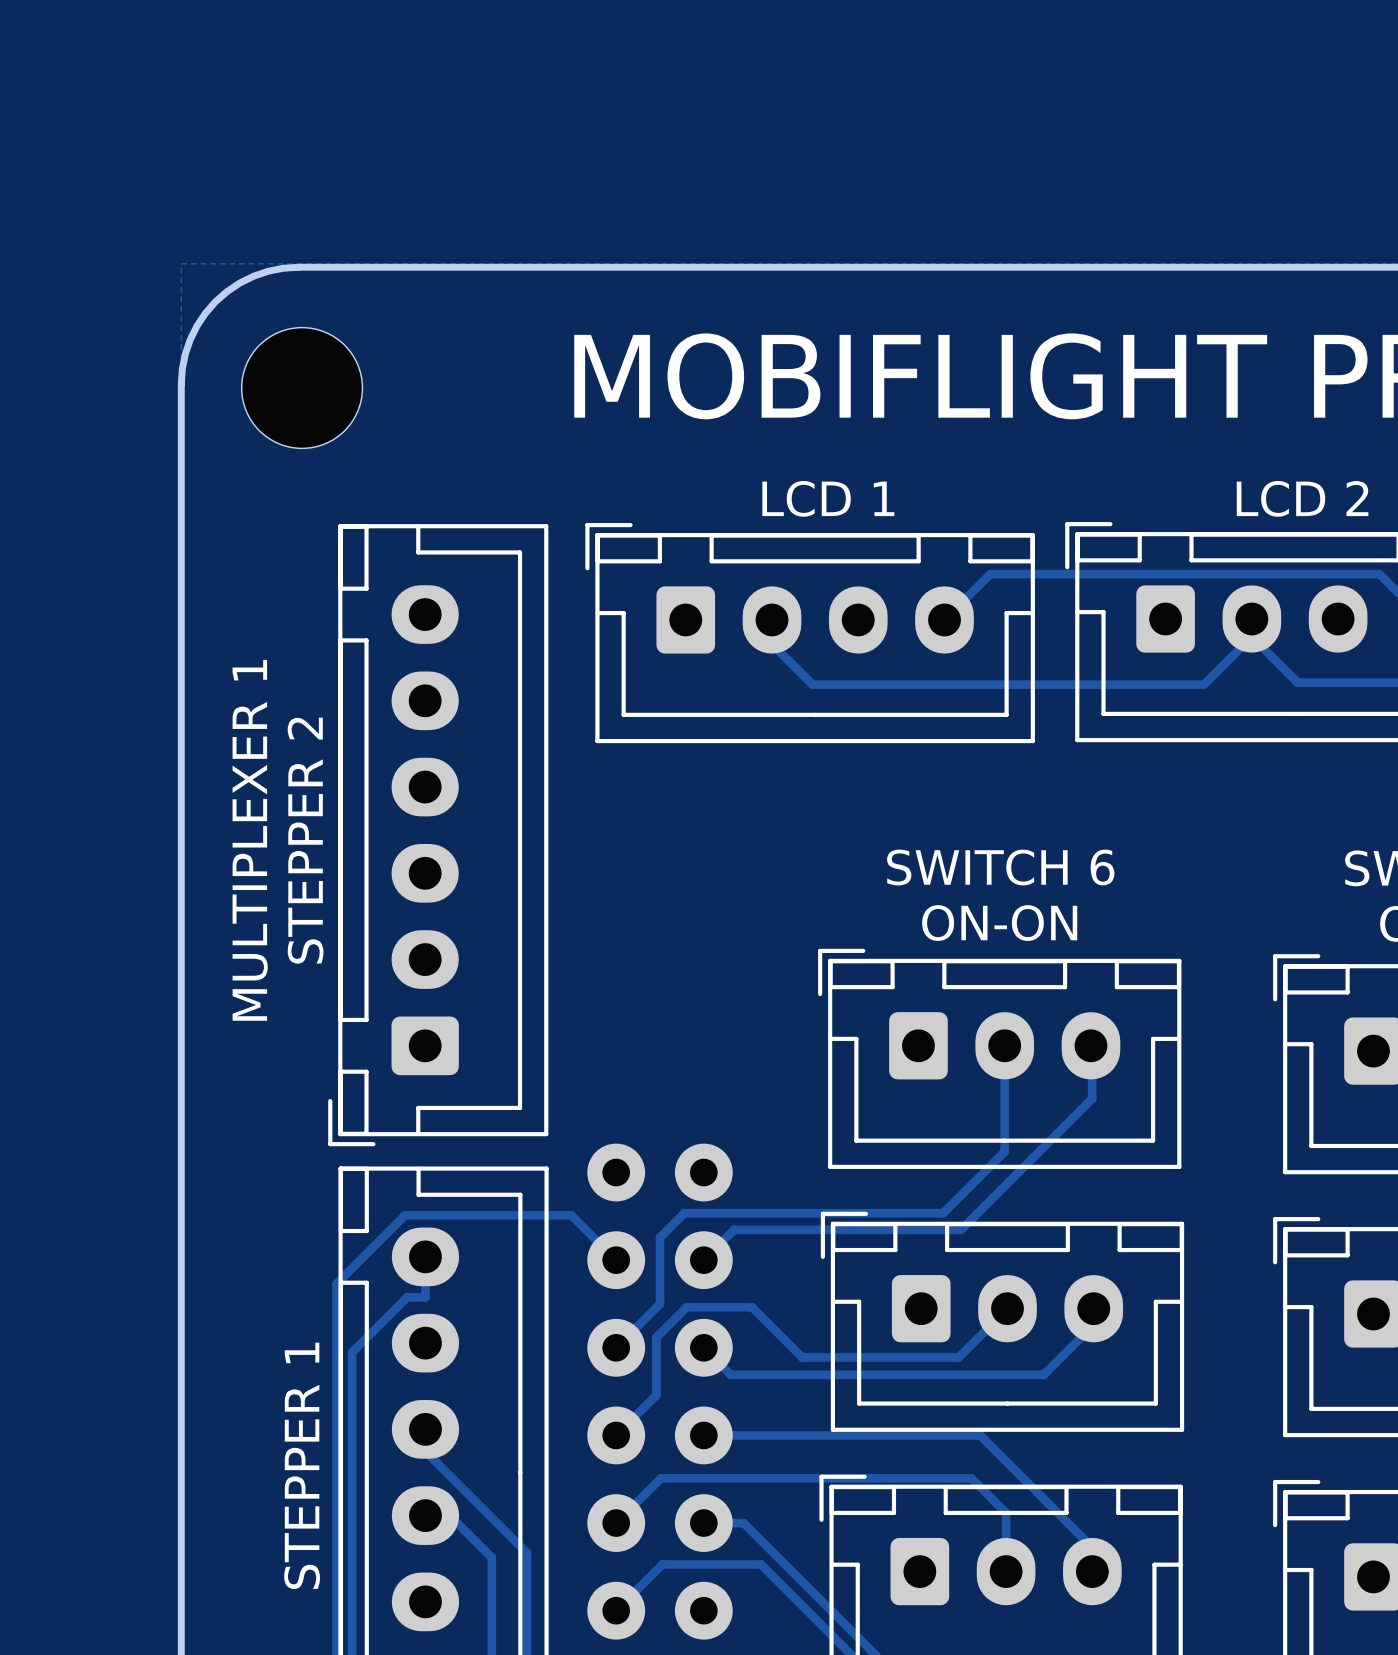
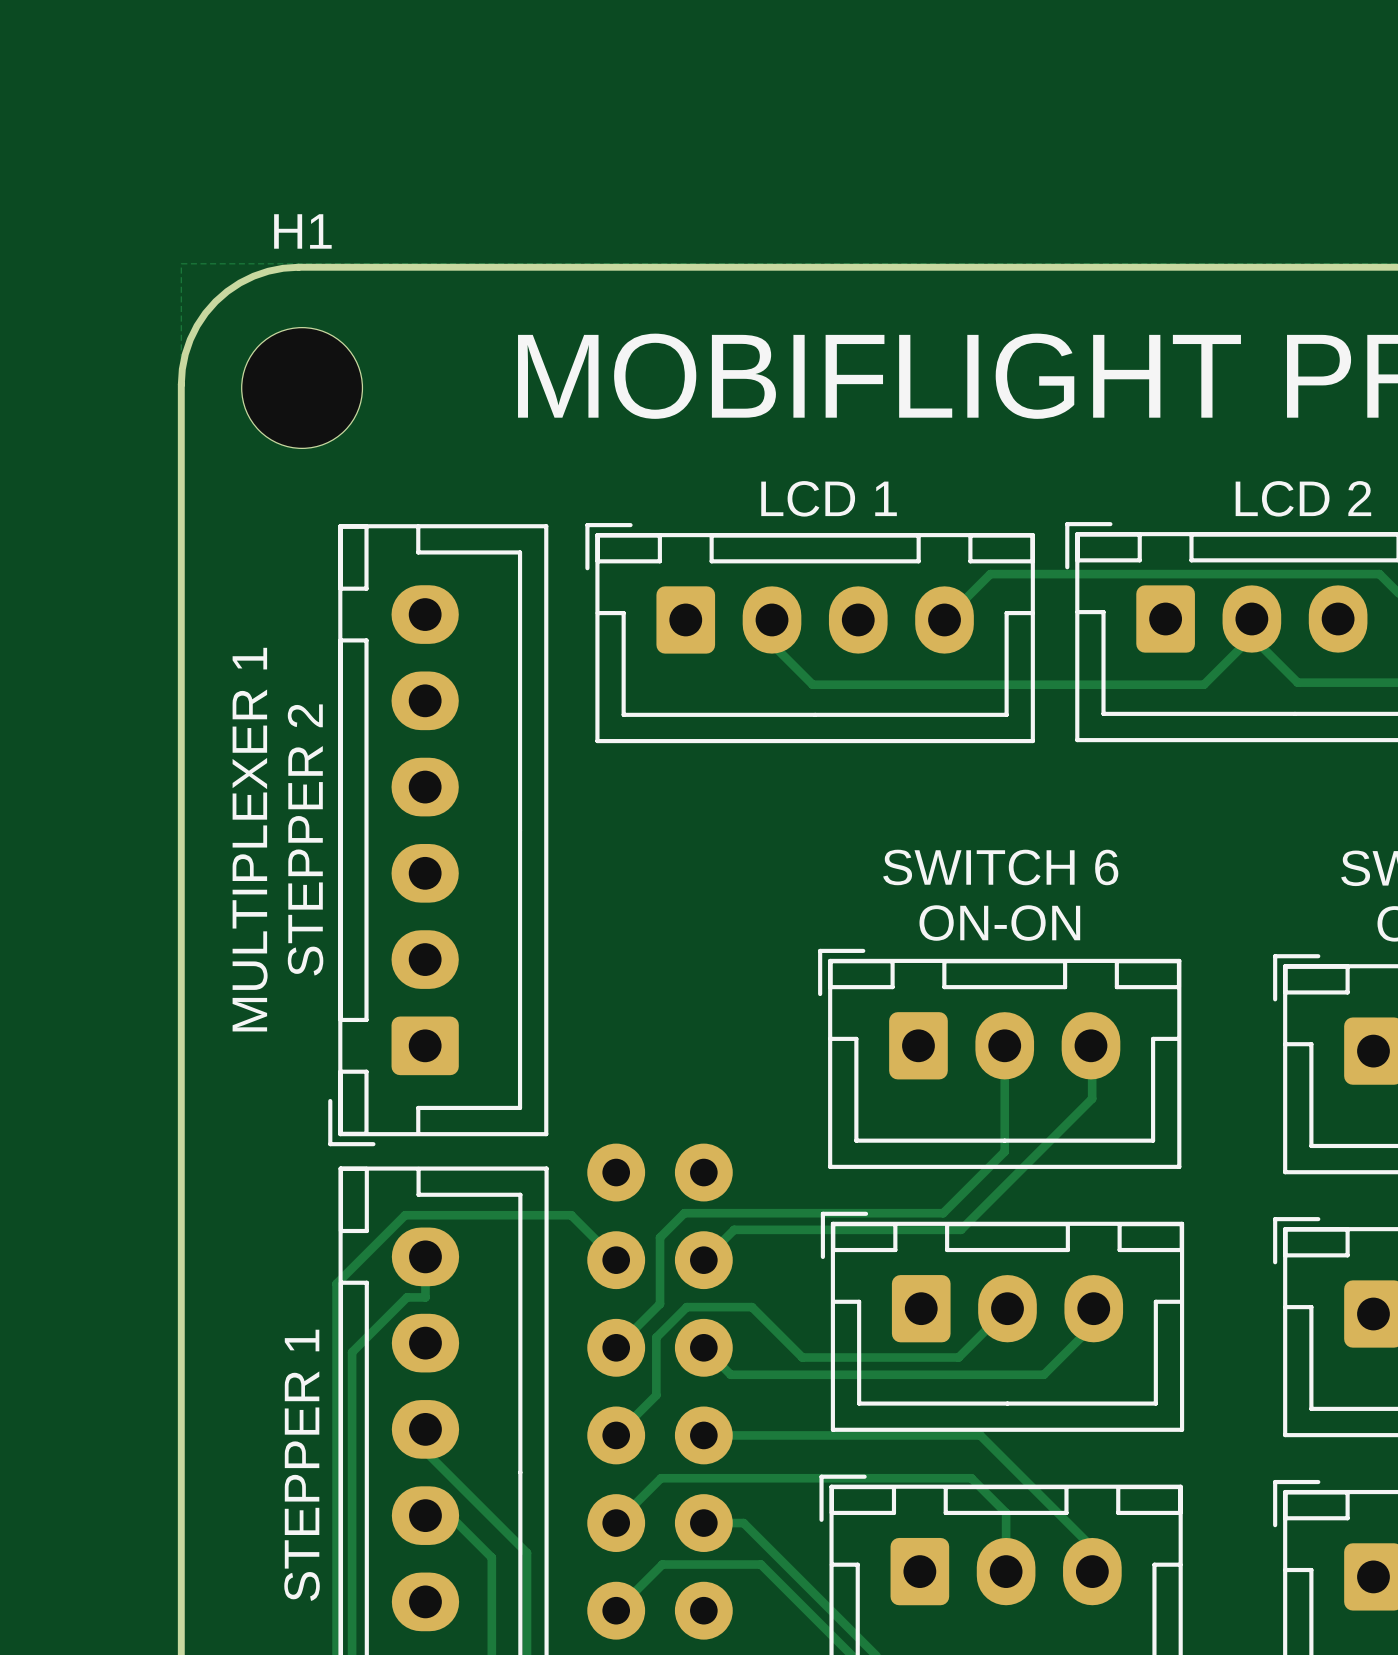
H1 name: none -> H1 (302, 231)

